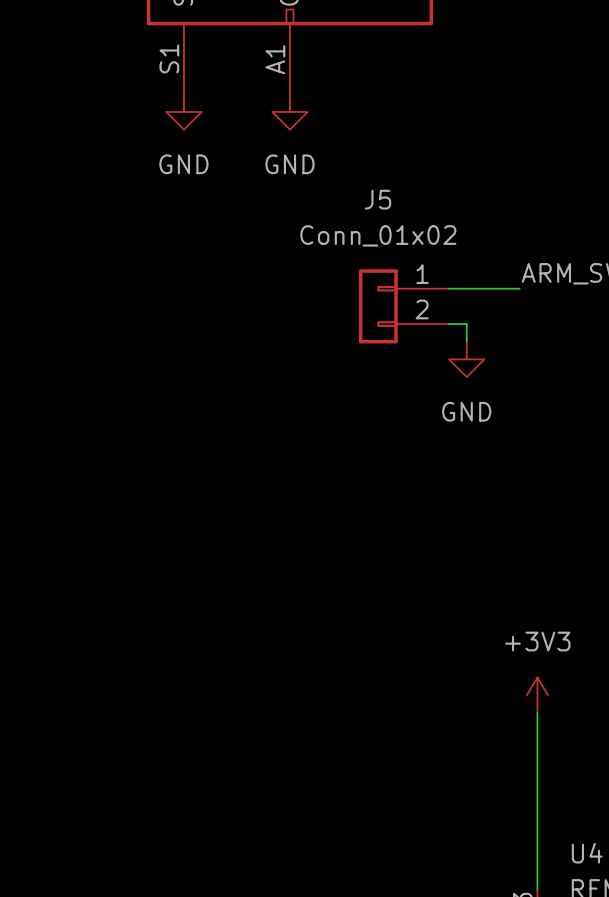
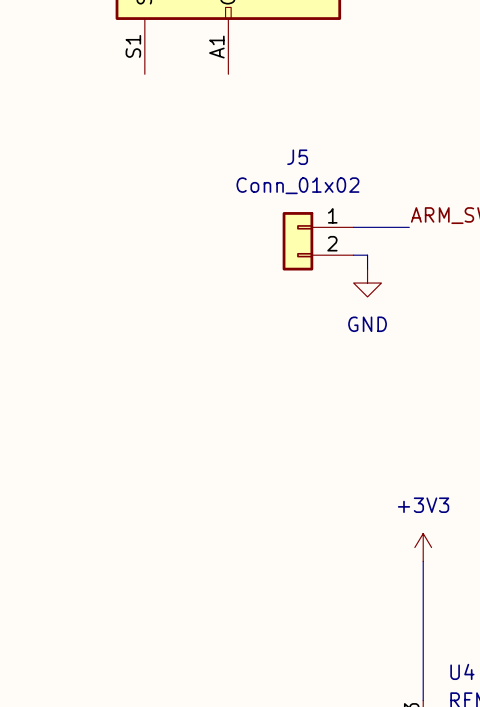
power symbol: GND (183, 111) -> none
power symbol: GND (289, 111) -> none

